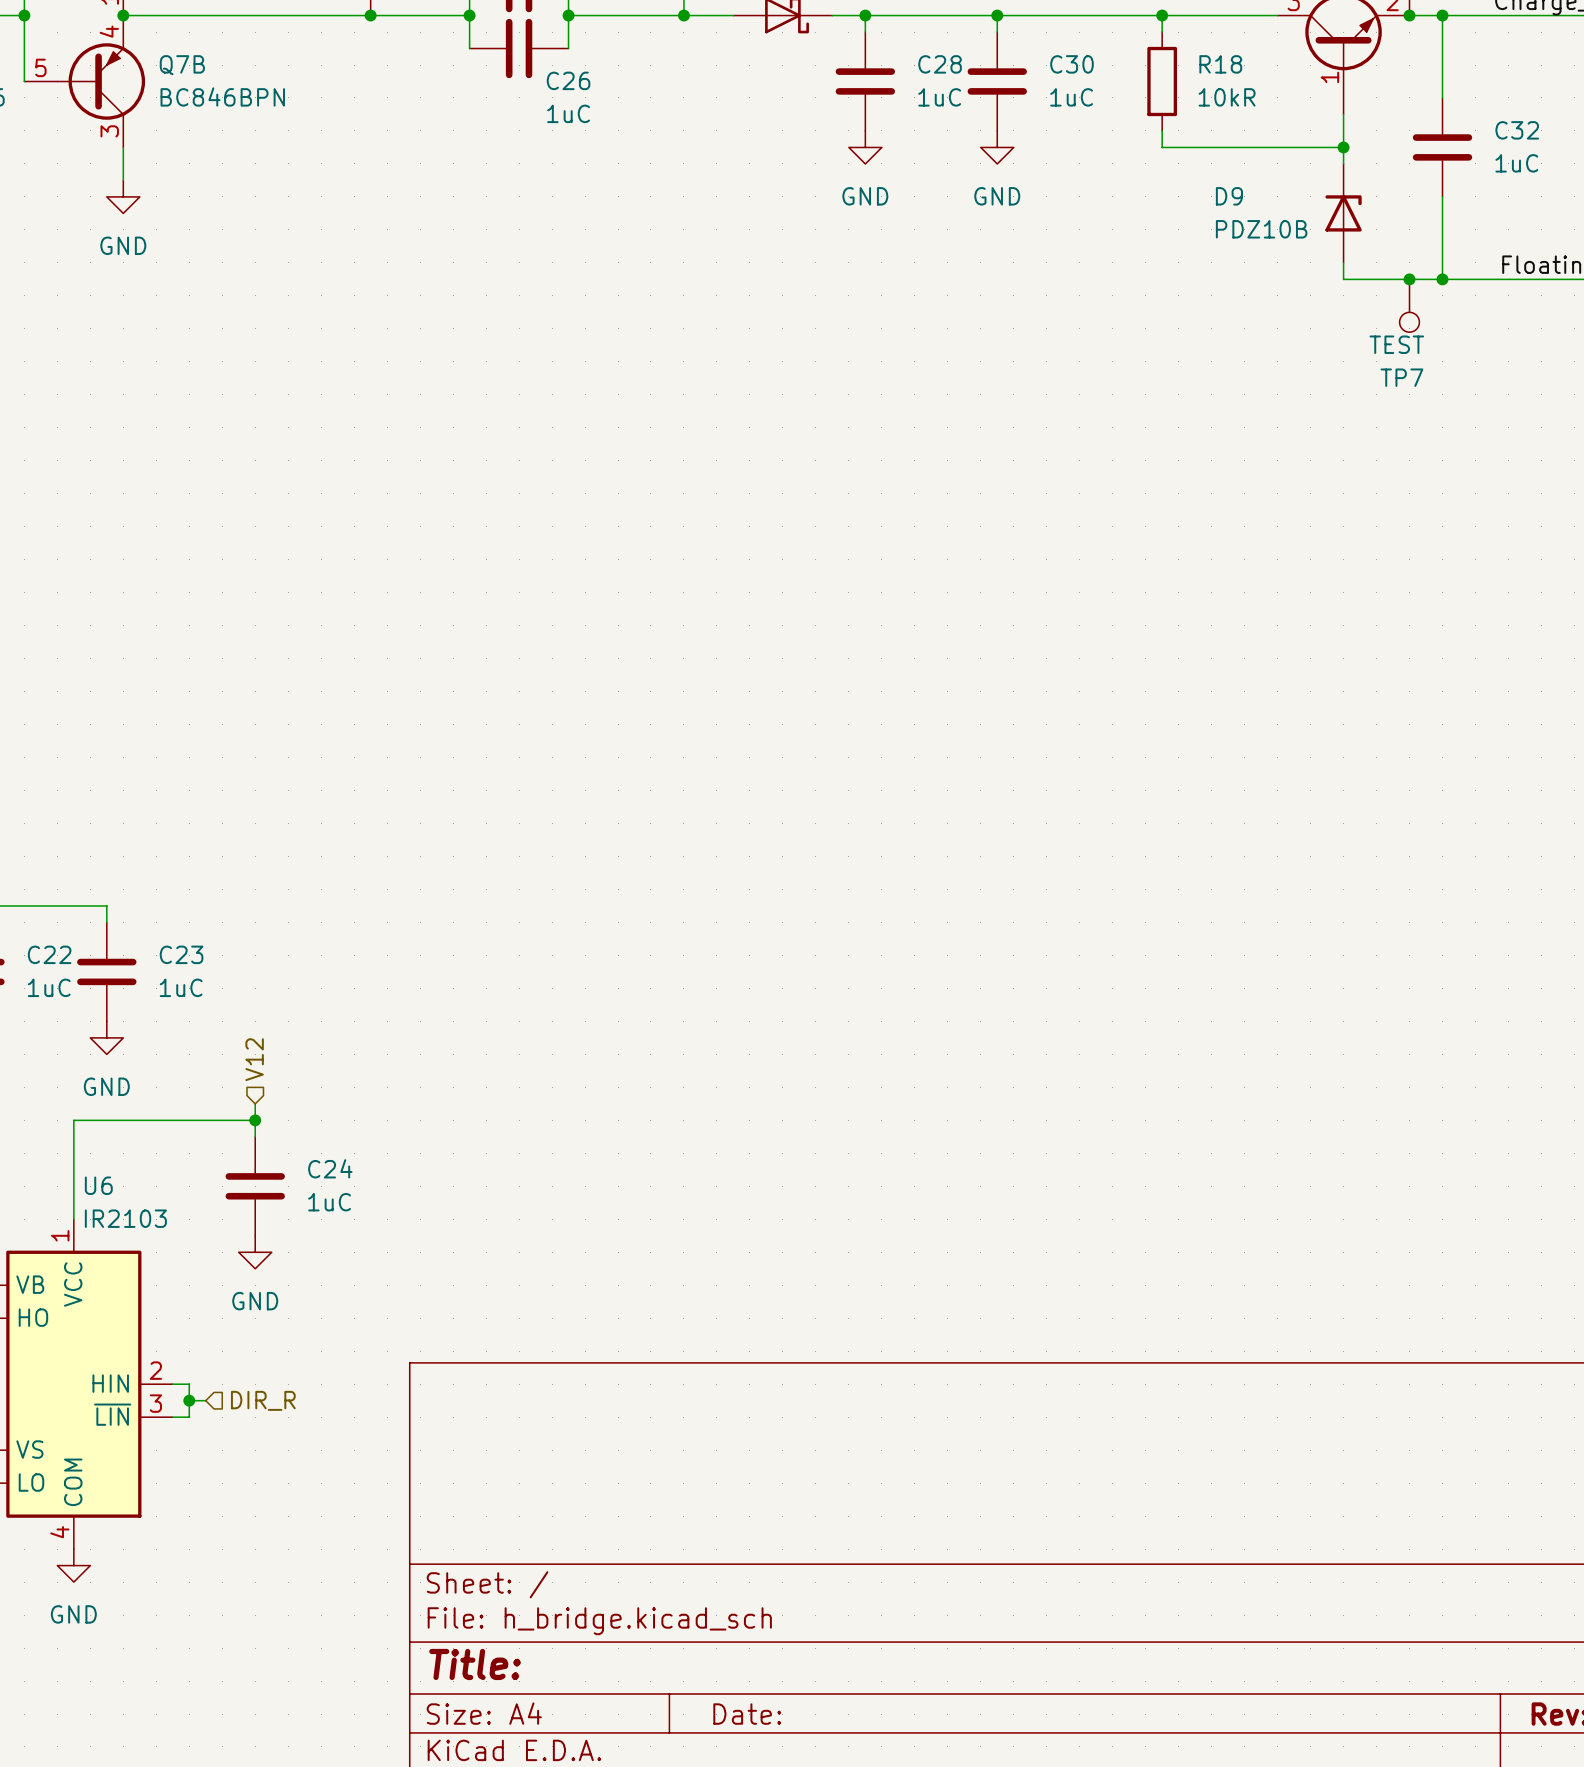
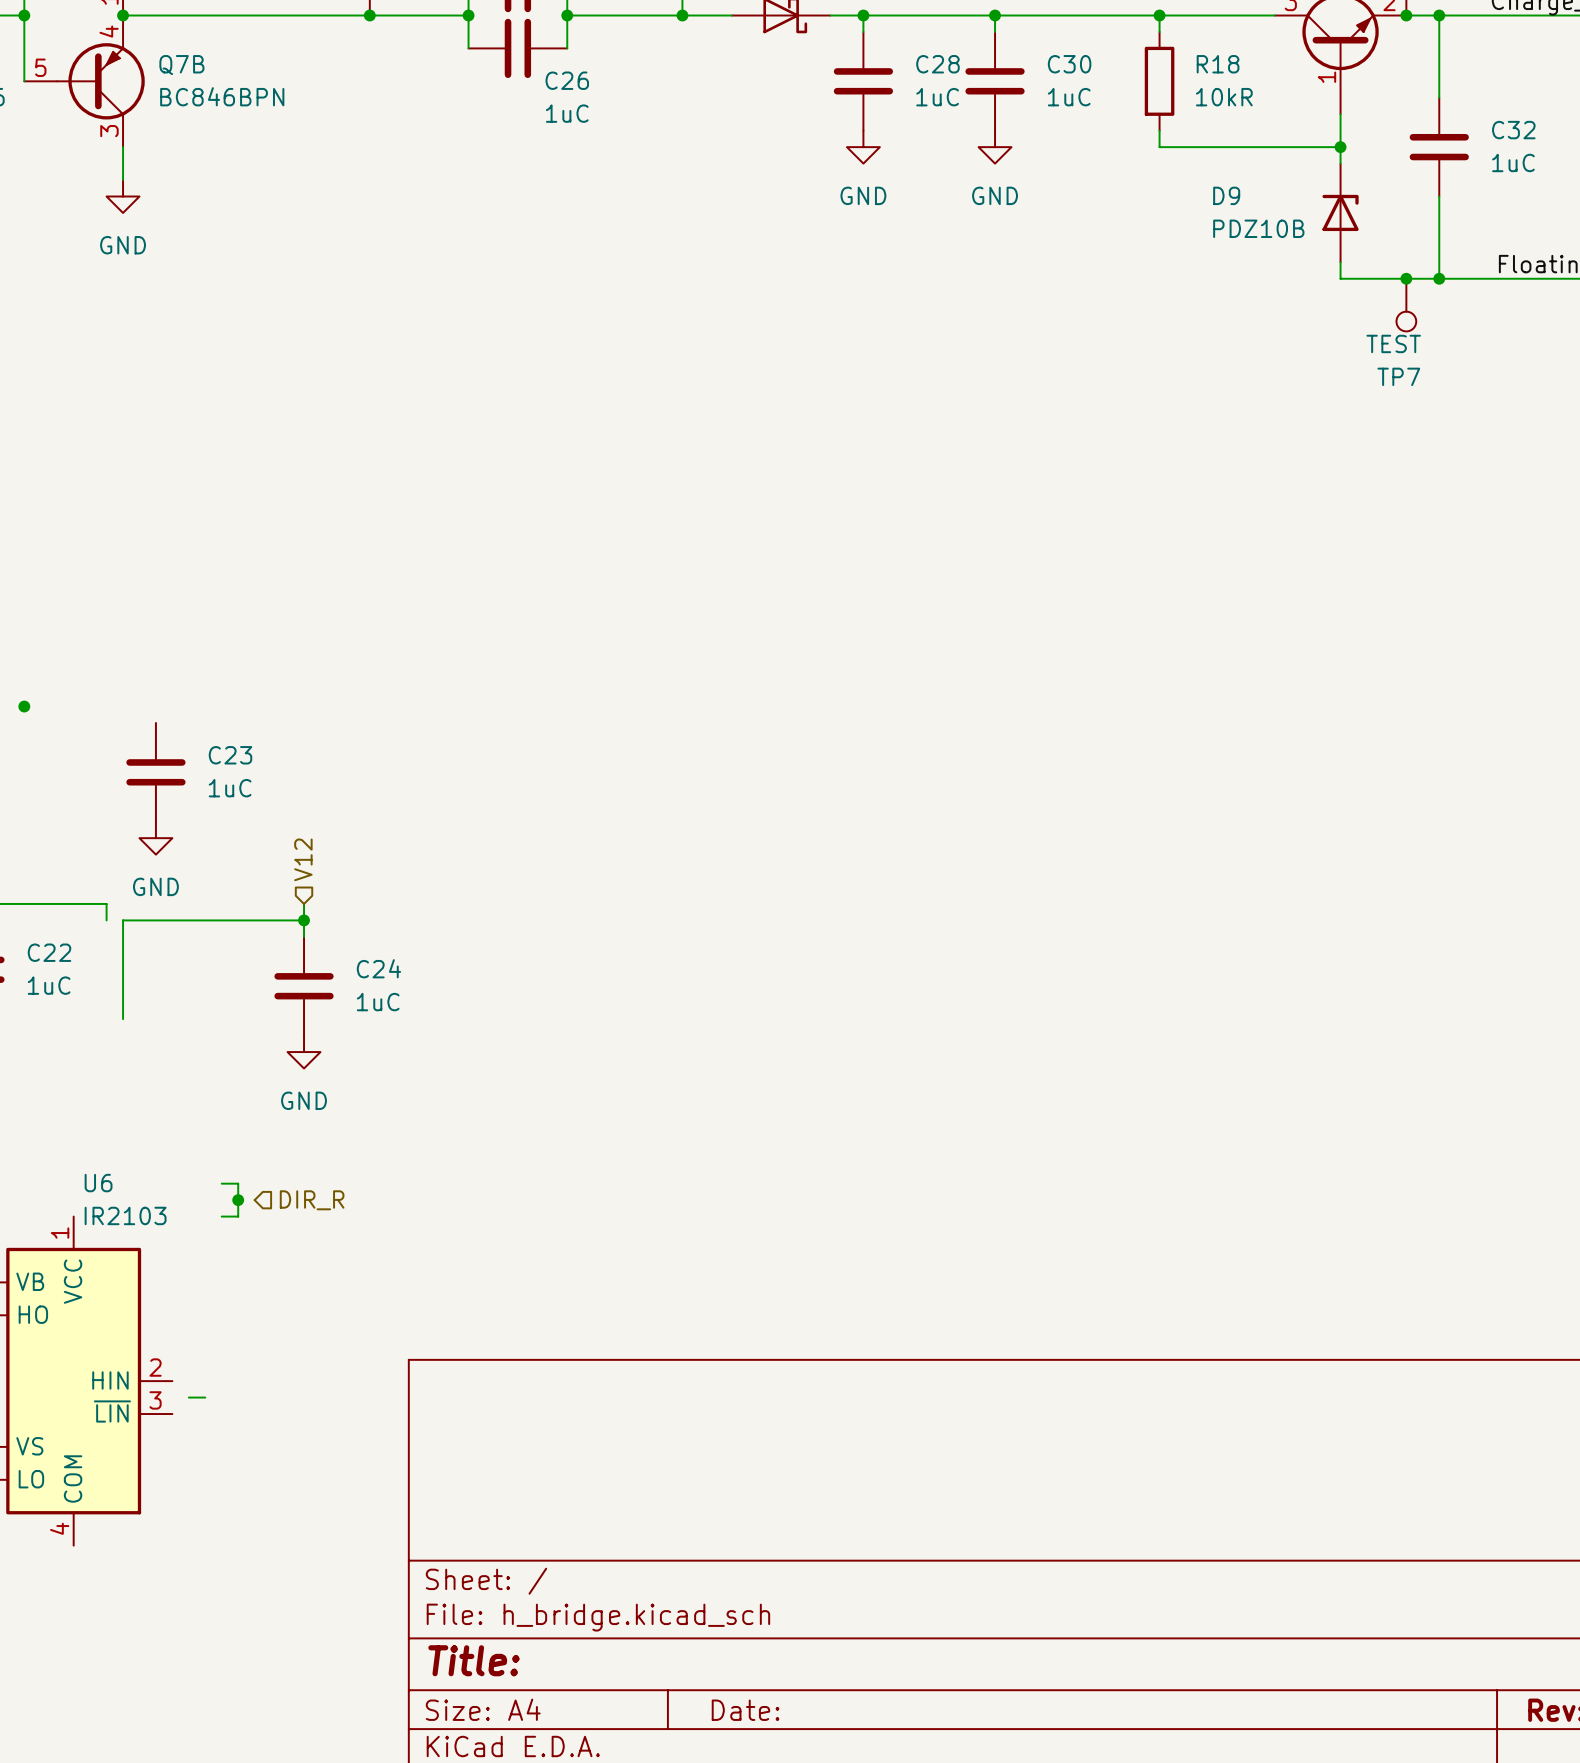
junction: none -> (24, 706)
power symbol: none -> GND (155, 838)
junction: none -> (304, 920)
C23 position: (106, 971) -> (155, 772)
power symbol: GND (106, 1037) -> none
power symbol: none -> GND (304, 1052)
hierarchical label position: V12 (254, 1059) -> V12 (303, 859)
wire: (255, 1103) (255, 1136) -> (304, 903) (304, 936)
wire: (255, 1120) (73, 1120) (73, 1219) -> (304, 920) (123, 920) (123, 1019)
junction: (255, 1120) -> none
C24 position: (255, 1186) -> (304, 986)
junction: none -> (238, 1200)
power symbol: GND (255, 1252) -> none
wire: (172, 1384) (189, 1384) (189, 1417) (172, 1417) -> (221, 1183) (238, 1183) (238, 1216) (221, 1216)
junction: (189, 1400) -> none
hierarchical label position: DIR_R (263, 1400) -> DIR_R (312, 1200)
power symbol: GND (73, 1565) -> none

